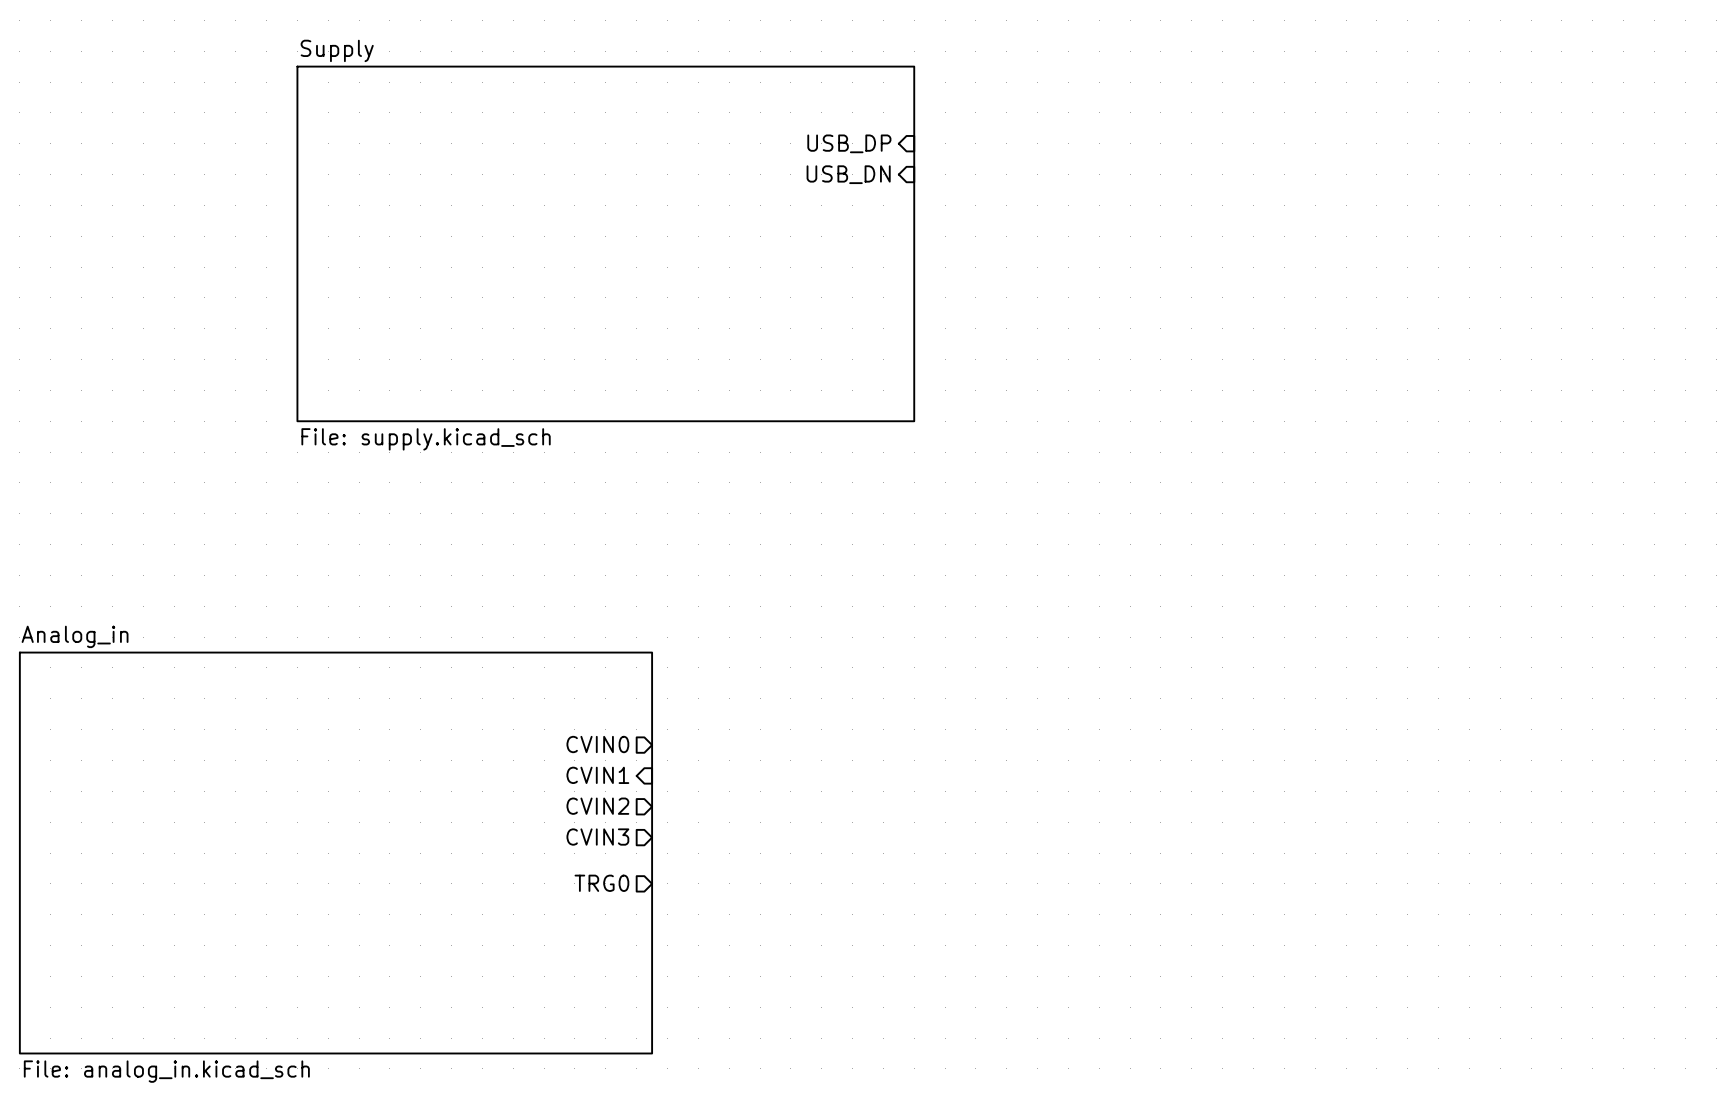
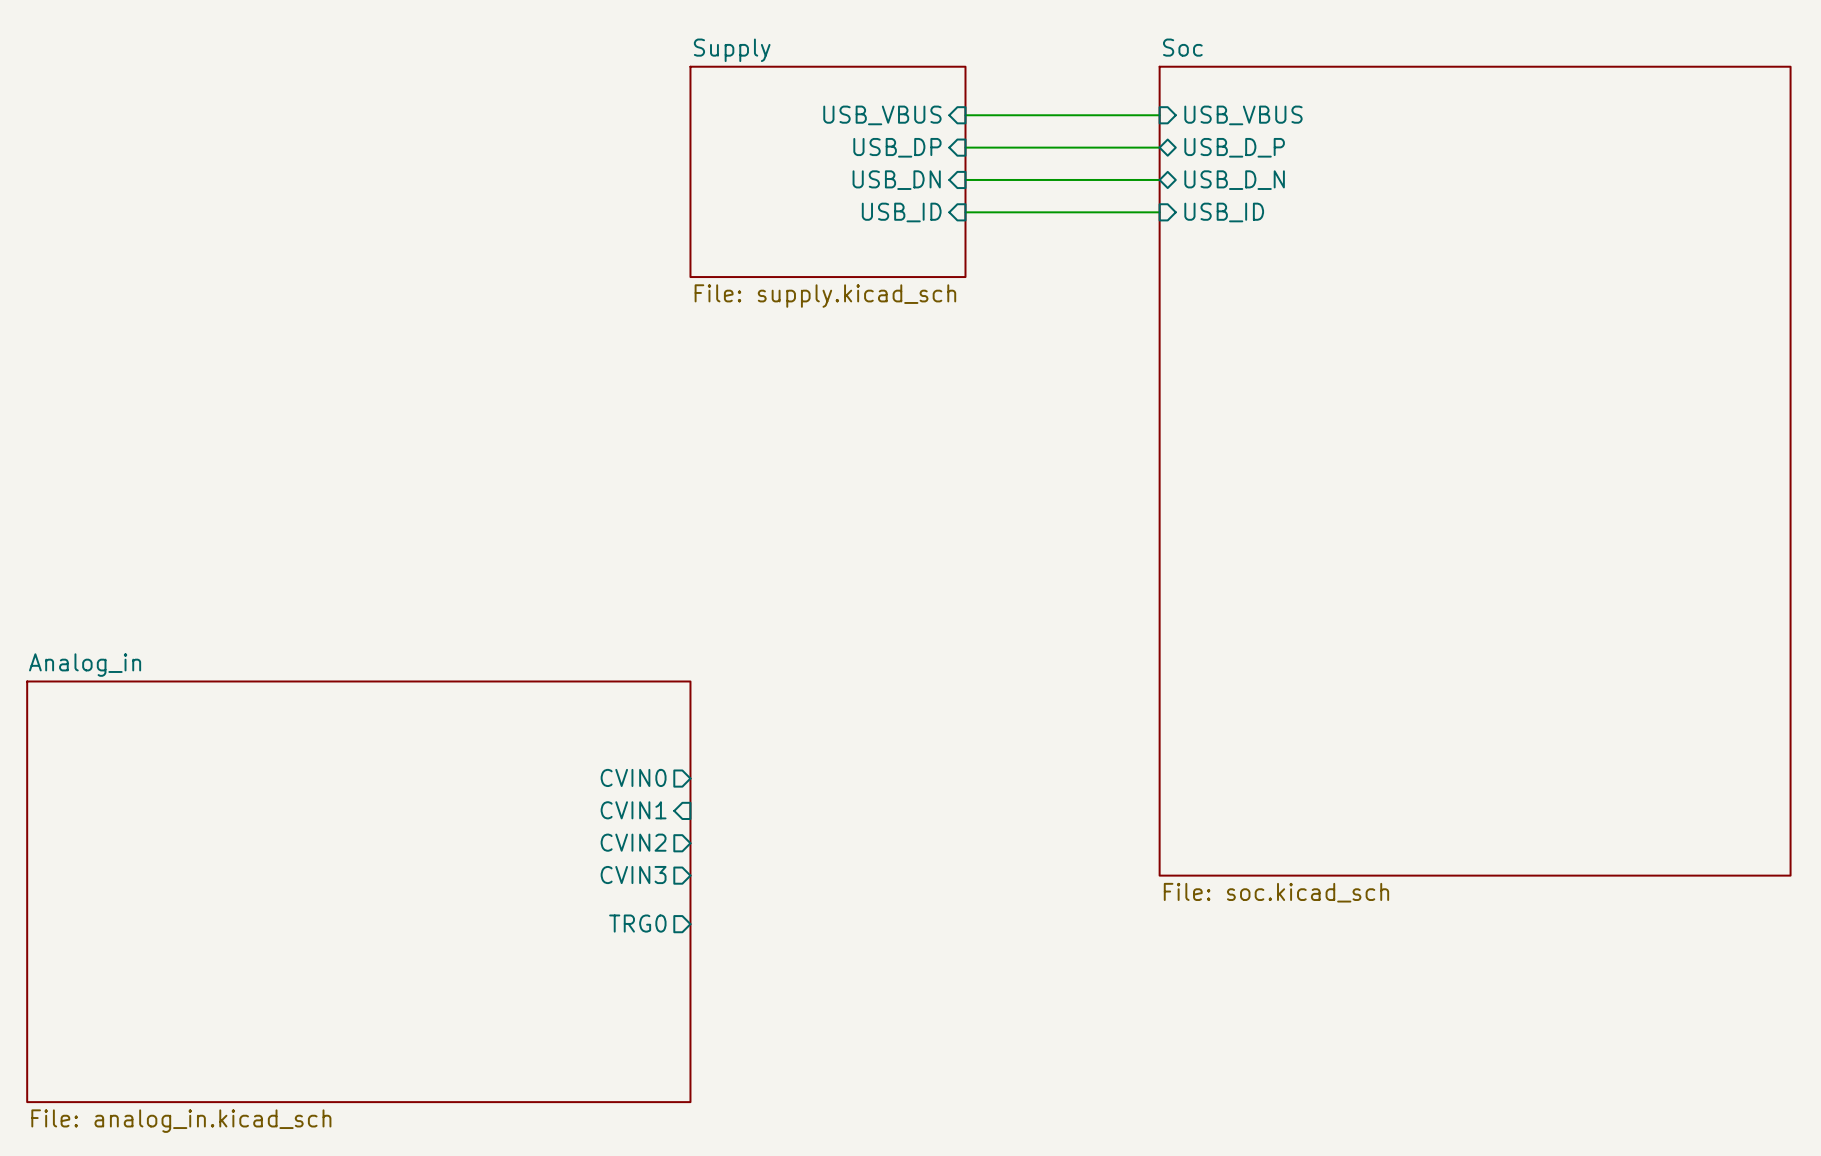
wire: none -> (965, 115) (1159, 115)
sheet pin: none -> USB_VBUS (882, 115)
sheet pin: none -> USB_VBUS (1243, 115)
wire: none -> (965, 147) (1159, 147)
sheet pin: none -> USB_D_P (1234, 147)
sheet Supply: none -> File: supply.kicad_sch (827, 171)
wire: none -> (965, 179) (1159, 179)
sheet pin: none -> USB_D_N (1234, 180)
sheet pin: none -> USB_ID (901, 212)
wire: none -> (965, 212) (1159, 212)
sheet pin: none -> USB_ID (1224, 212)
sheet Supply: File: supply.kicad_sch (605, 243) -> none
sheet Soc: none -> File: soc.kicad_sch (1475, 471)

